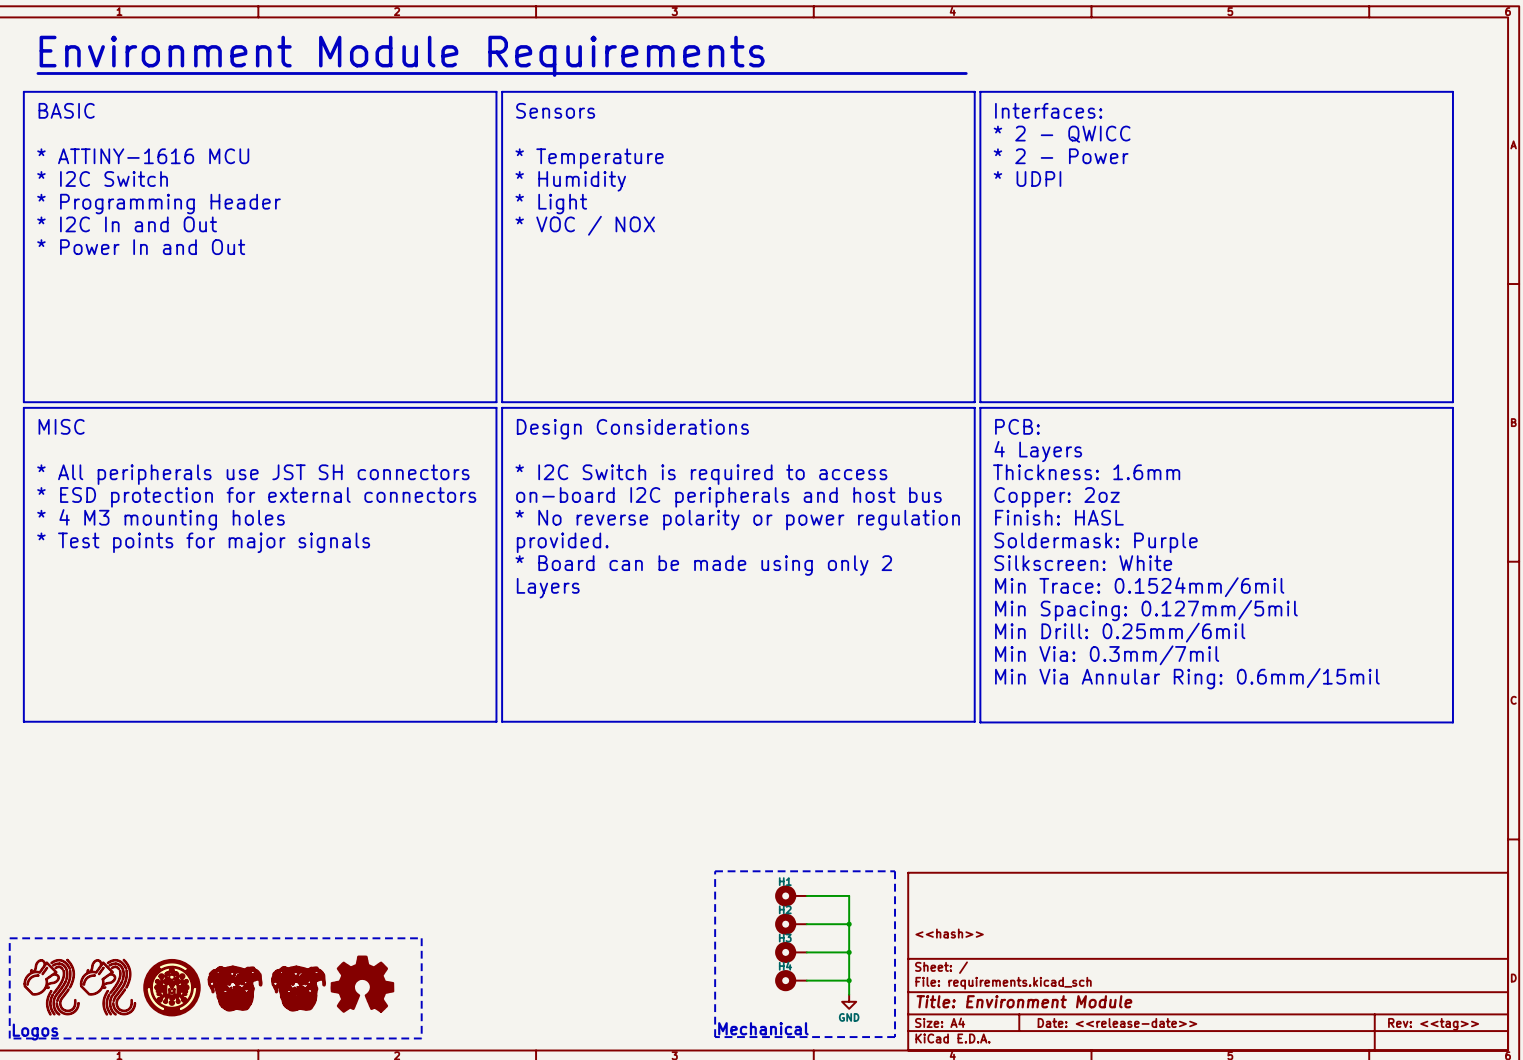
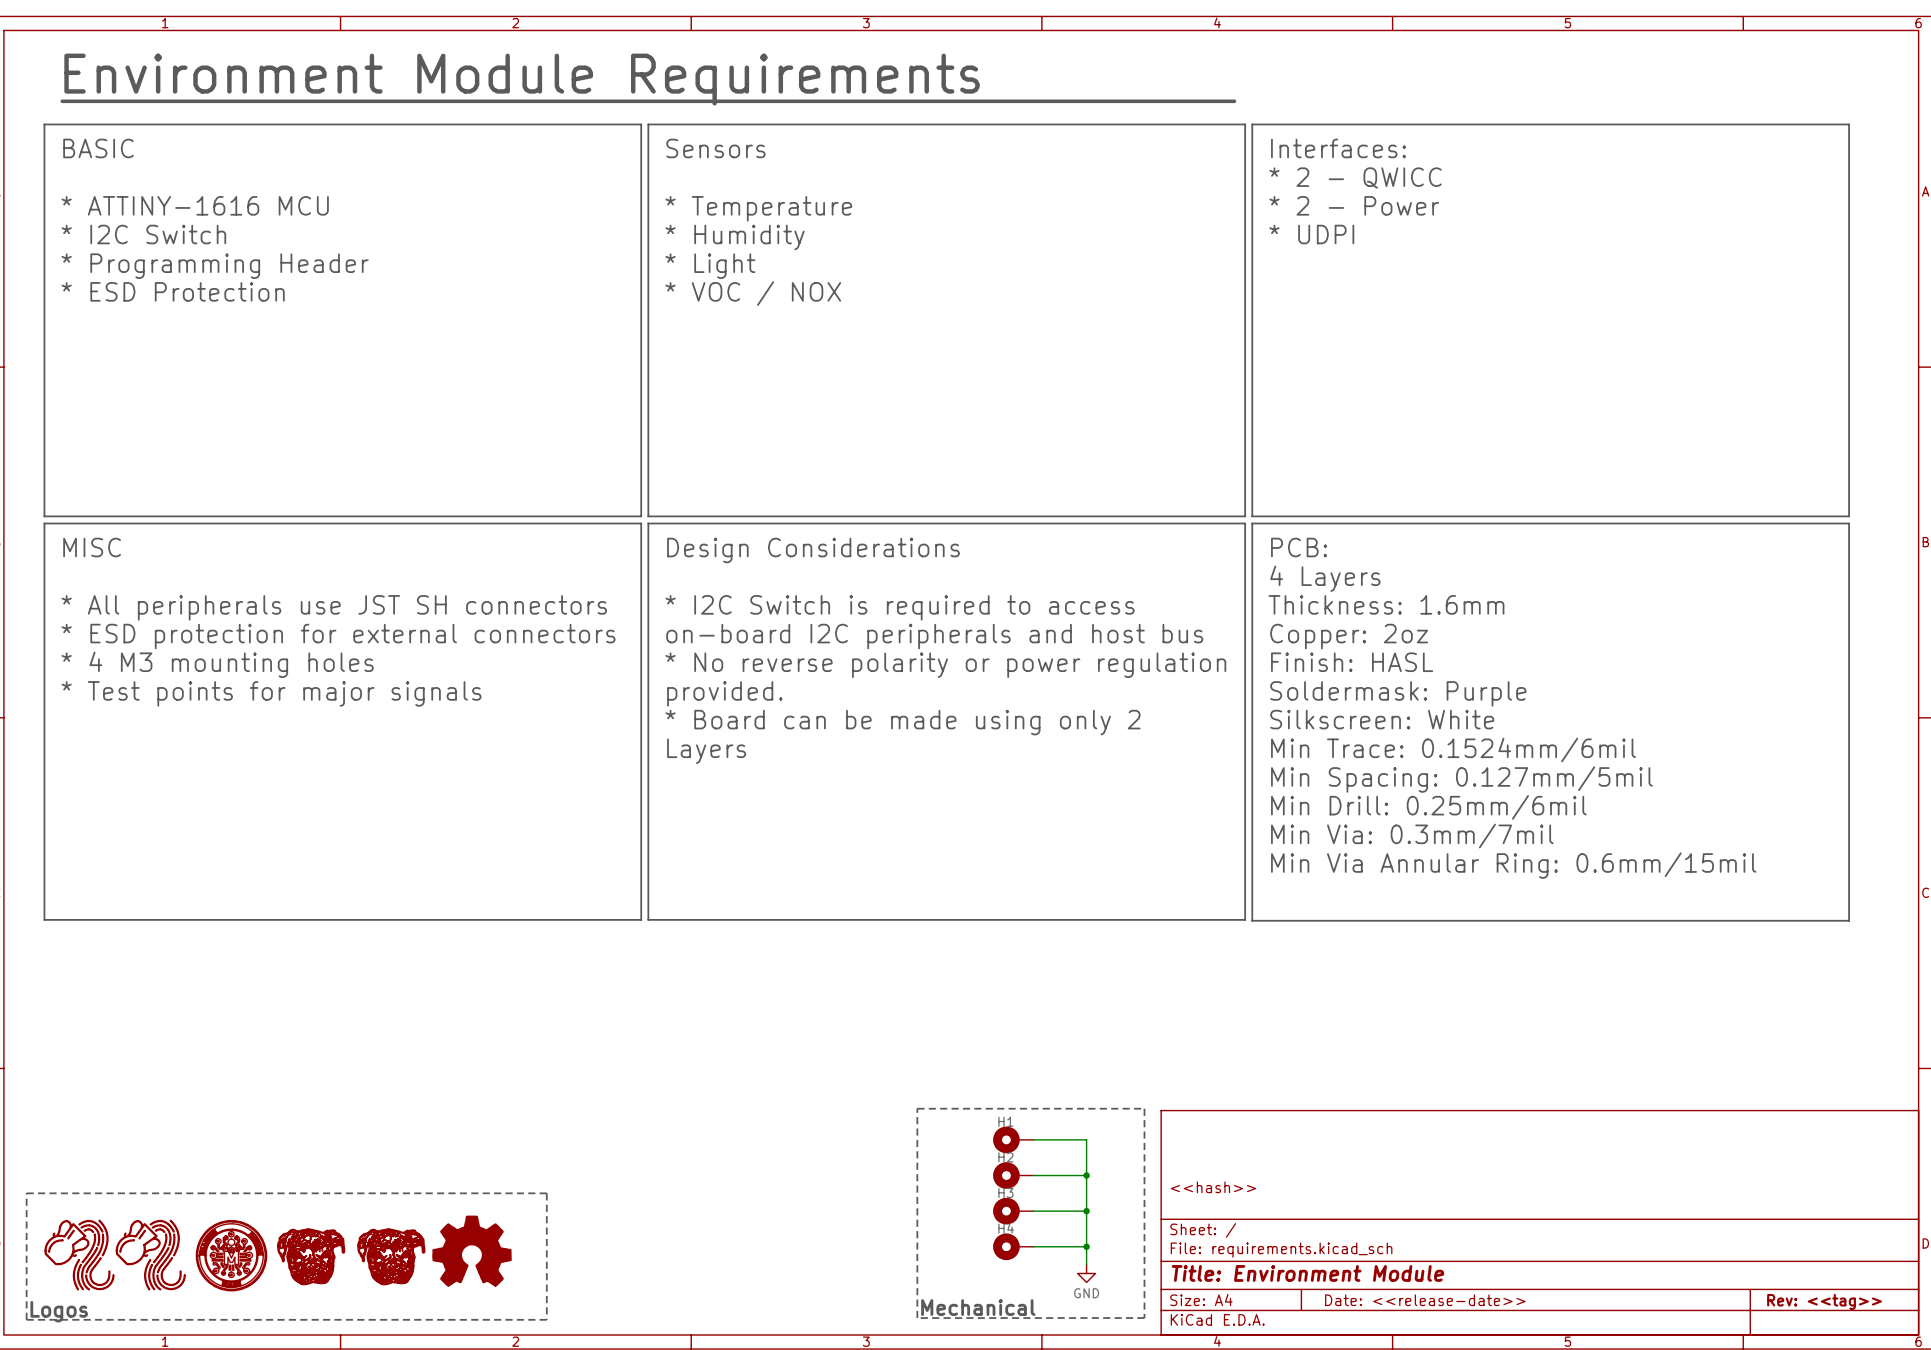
text: * I2C In and Out (127, 224) -> * ESD Protection (173, 291)
text: * Power In and Out (141, 247) -> none

